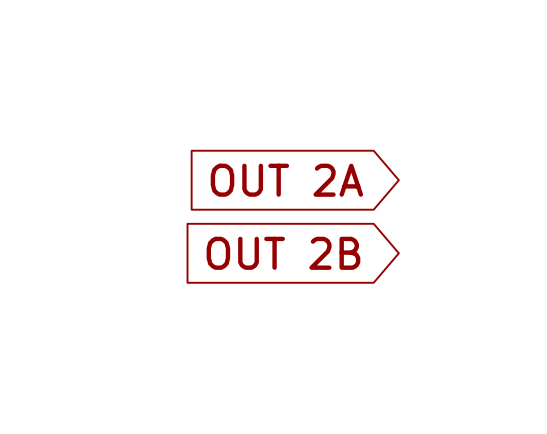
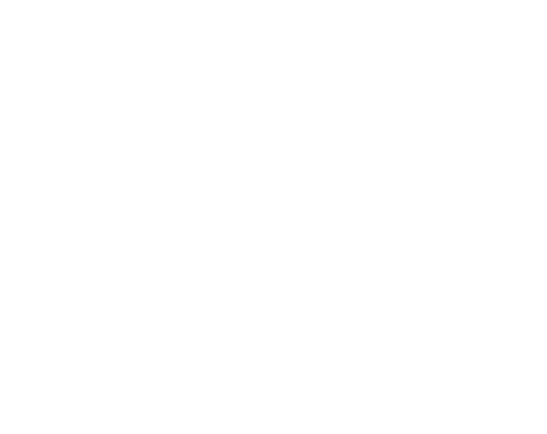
global label: OUT 2A (286, 180) -> none
global label: OUT 2B (283, 253) -> none

